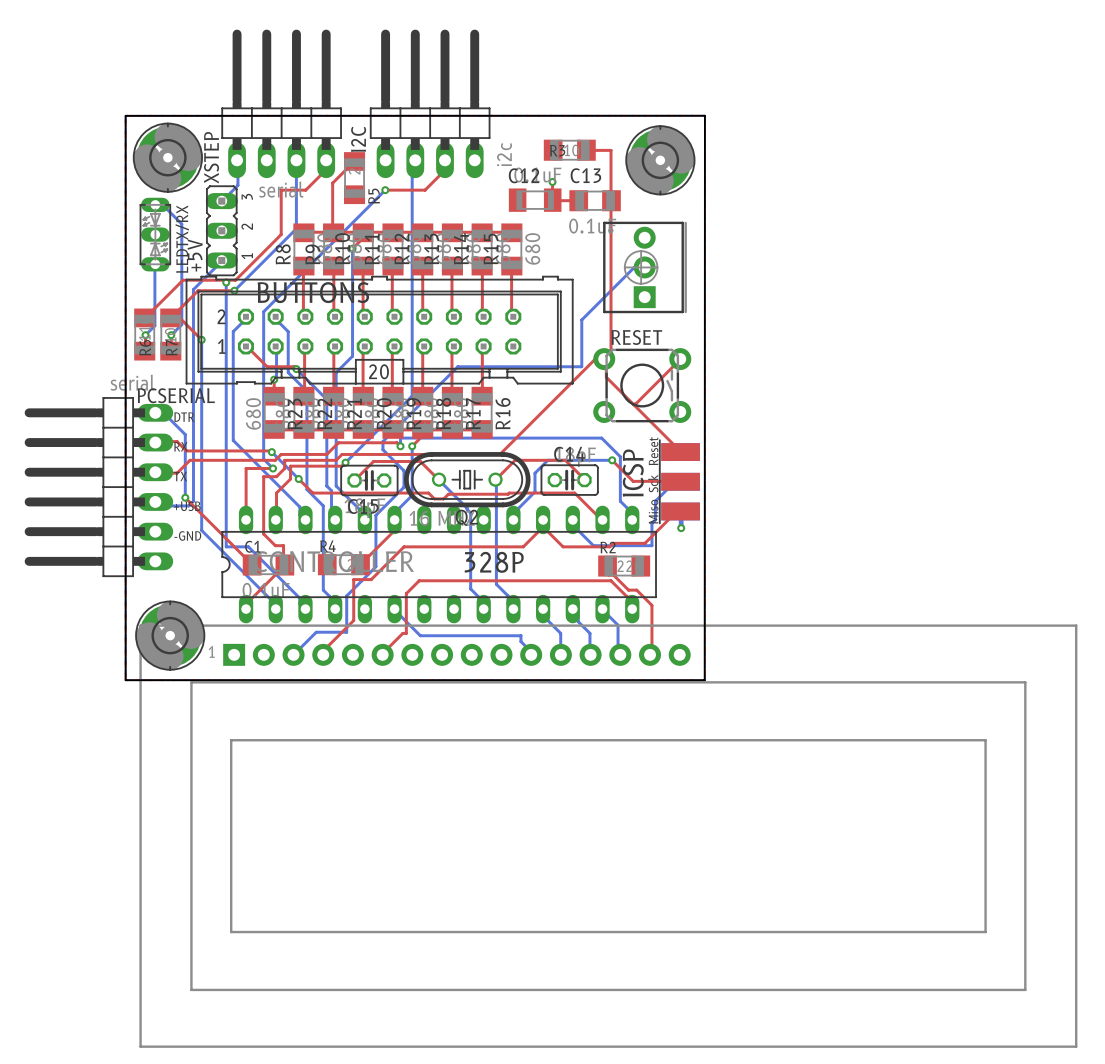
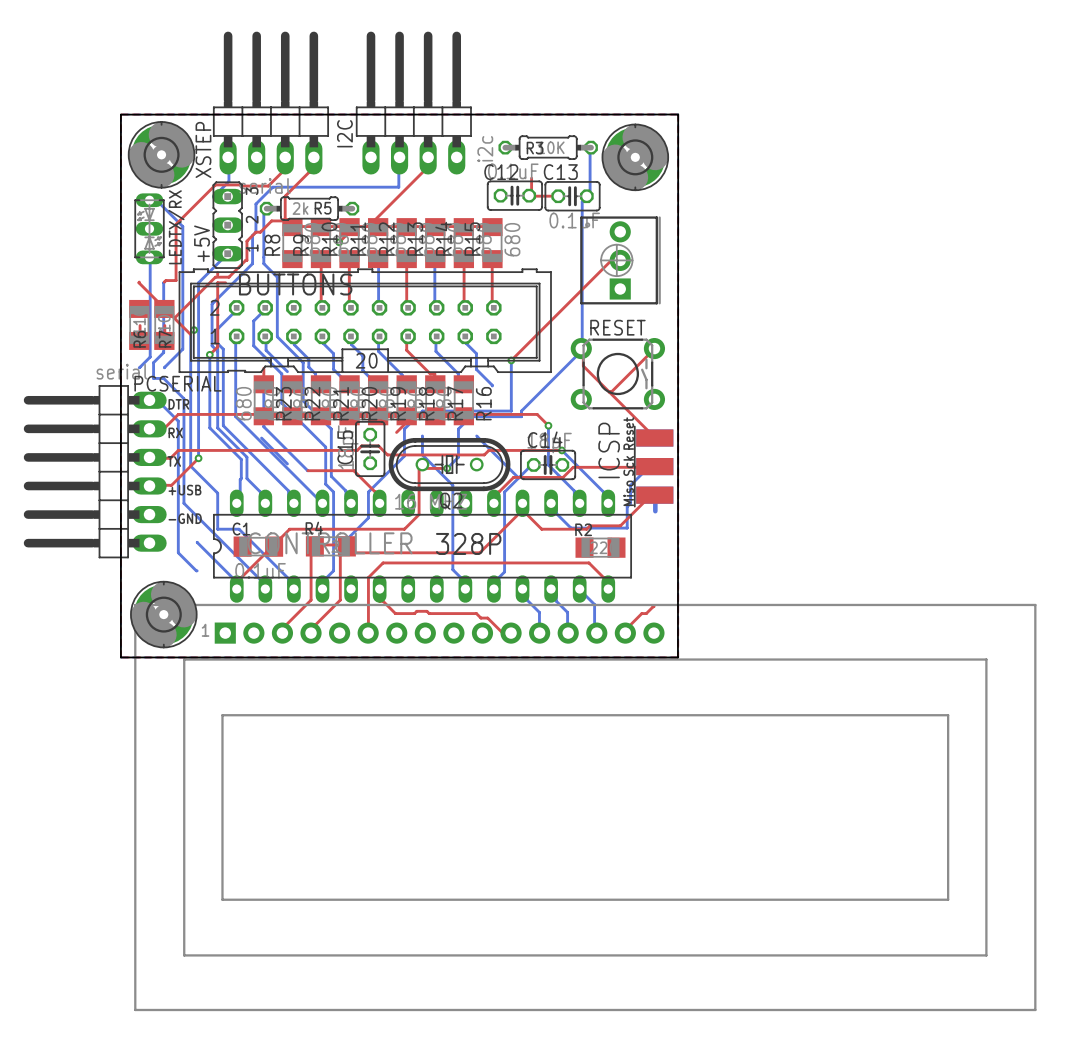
R3 footprint: [543, 139, 596, 161] -> [498, 135, 598, 160]
top track: (586, 150) (611, 150) (611, 358) (595, 358) (499, 454) (342, 454) (336, 460) (284, 460) (284, 468) (276, 476) (263, 476) (263, 533) (275, 545) (283, 545) (284, 564) (246, 604) -> none
bottom track: none -> (591, 147) (590, 193) (582, 201) (581, 351) (521, 411) (521, 416) (470, 416) (458, 429) (458, 457) (447, 468)
R5 footprint: [343, 152, 366, 205] -> [259, 196, 360, 221]
bottom track: (296, 160) (296, 228) (234, 290) -> none
top track: none -> (285, 157) (285, 172) (281, 172) (268, 186) (215, 184) (176, 224) (176, 280) (164, 282)
top track: (354, 161) (332, 183) (333, 232) -> none
top track: (325, 170) (305, 190) (281, 190) (281, 234) (235, 280) (182, 280) (144, 317) -> (313, 166) (313, 172) (308, 172) (285, 196) (285, 220) (271, 220) (260, 232) (255, 232) (246, 241) (246, 260) (228, 277) (215, 277) (174, 318)
bottom track: (414, 174) (412, 177) (412, 395) (345, 462) -> (398, 171) (398, 187) (272, 187) (255, 204) (255, 232) (252, 235) (252, 263) (212, 304) (212, 345) (217, 351)
via: (552, 181) -> none
C12 footprint: [508, 188, 562, 212] -> [486, 180, 543, 211]
bottom track: (385, 190) (263, 311) (263, 330) -> none
top track: (385, 190) (425, 190) -> (368, 226) (408, 186)
via: (385, 190) -> none
C13 footprint: [569, 190, 621, 212] -> [544, 181, 601, 212]
bottom track: none -> (266, 208) (263, 211) (263, 263) (277, 277) (277, 322)
bottom track: (181, 224) (181, 324) (171, 335) -> (174, 218) (182, 226) (182, 349) (164, 367)
+5V position: (221, 230) -> (227, 225)
bottom track: (352, 248) (352, 356) (336, 372) (336, 486) (359, 509) -> (277, 336) (303, 362) (303, 400) (331, 429) (331, 476) (345, 493)
bottom track: (221, 260) (193, 289) (193, 501) (188, 505) (156, 505) (155, 501) -> none
bottom track: none -> (227, 253) (198, 282) (198, 458)
bottom track: (155, 264) (154, 325) (145, 335) -> (149, 257) (150, 357) (139, 367)
bottom track: none -> (378, 257) (379, 307)
bottom track: none -> (435, 257) (434, 306) (436, 307)
top track: (303, 266) (303, 316) (305, 316) -> none
top track: (393, 266) (392, 316) (394, 316) -> none
top track: (452, 266) (451, 316) (453, 316) -> none
bottom track: (644, 267) (634, 267) (581, 319) (581, 366) (457, 366) (382, 441) (382, 449) (404, 470) (404, 487) -> (511, 360) (511, 411) (422, 411) (404, 429) (404, 456) (388, 471)
top track: none -> (620, 260) (610, 261) (511, 360)
bottom track: (226, 282) (226, 338) -> (224, 322) (217, 328)
via: (226, 282) -> none
top track: none -> (139, 282) (190, 334)
top track: (226, 290) (198, 290) (170, 317) (175, 314) (201, 339) -> (217, 282) (217, 346) (209, 354)
via: (234, 290) -> none
bottom track: (275, 316) (288, 331) -> (265, 307) (253, 321)
bottom track: (233, 331) (233, 440) -> (217, 343) (223, 349) (224, 426)
via: (145, 335) -> none
via: (171, 335) -> none
bottom track: (201, 339) (201, 530) -> (164, 282) (163, 352) (153, 362) (153, 378) (163, 378) (183, 398) (183, 503) (194, 513)
bottom track: none -> (190, 334) (190, 466) (217, 493)
top track: (245, 346) (267, 366) (294, 366) (296, 369) -> none
bottom track: (288, 346) (288, 372) -> none
bottom track: none -> (293, 336) (294, 344) (308, 359) (308, 367) (315, 373) (315, 380) (320, 385)
top track: (305, 346) (303, 396) -> none
bottom track: none -> (322, 336) (323, 343) (333, 353) (333, 369) (349, 385)
top track: (335, 346) (333, 396) -> none
bottom track: none -> (350, 336) (351, 344) (362, 355) (362, 370) (378, 385)
top track: (364, 346) (363, 346) (363, 396) -> none
bottom track: none -> (379, 336) (378, 351) (402, 375) (402, 380) (406, 385)
top track: (394, 346) (392, 346) (393, 396) -> none
bottom track: none -> (436, 336) (435, 351) (458, 373) (458, 380) (463, 385)
top track: (453, 346) (451, 346) (451, 385) -> none
bottom track: none -> (465, 336) (466, 343) (476, 353) (476, 369) (492, 385)
top track: (483, 346) (482, 396) -> none
bottom track: (263, 356) (263, 459) (273, 468) -> none
bottom track: (276, 360) (276, 377) (274, 379) -> (266, 350) (277, 361)
top track: (422, 360) (422, 396) -> (406, 350) (430, 373) (434, 373)
bottom track: none -> (209, 354) (209, 427) (241, 459) (240, 499) (236, 503)
via: none -> (209, 354)
bottom track: (296, 369) (326, 399) (326, 486) (331, 490) (331, 516) -> (236, 336) (235, 416) (318, 499)
via: (296, 369) -> none
via: none -> (511, 360)
via: (274, 379) -> none
bottom track: (298, 383) (306, 391) (306, 489) (323, 505) (323, 590) (330, 597) (330, 604) (335, 609) -> (253, 345) (281, 373) (281, 403) (325, 447) (325, 484) (333, 492) (333, 570) (326, 577) (326, 585) (322, 589)
bottom track: none -> (263, 385) (263, 426) (307, 470)
bottom track: none -> (548, 425) (548, 465) (574, 490) (574, 498) (579, 503)
via: none -> (548, 425)
top track: (171, 441) (177, 441) (186, 450) (271, 452) -> (164, 427) (178, 414) (537, 414) (548, 425)
bottom track: (226, 441) (226, 509) -> (217, 427) (246, 457) (246, 478) (260, 492) (260, 498) (265, 503)
bottom track: (400, 446) (400, 438) (601, 438) (620, 456) (620, 501) -> (561, 450) (596, 485)
top track: (400, 446) (396, 442) (338, 442) (326, 454) (281, 454) (275, 460) (189, 460) (185, 464) -> (561, 450) (488, 450) (484, 454) (387, 454) (378, 445) (361, 445) (357, 450) (178, 450)
via: (400, 446) -> none
bottom track: (412, 446) (412, 495) (399, 508) (399, 515) (394, 519) -> none
via: (412, 446) -> none
bottom track: none -> (476, 435) (518, 478)
via: (271, 452) -> none
bottom track: (612, 460) (547, 460) (534, 473) (534, 491) (518, 508) (518, 515) (513, 519) -> none
top track: (612, 460) (633, 481) (680, 481) -> (552, 477) (563, 477) (573, 467) (654, 466)
via: (612, 460) -> none
top track: (345, 462) (342, 466) (290, 466) (290, 479) (276, 493) (275, 519) -> none
via: (345, 462) -> none
via: none -> (561, 450)
top track: (273, 468) (246, 468) (246, 519) -> none
via: (273, 468) -> none
top track: none -> (198, 458) (171, 485) (149, 485)
top track: (298, 479) (312, 493) (428, 493) (434, 498) (443, 498) (448, 494) (533, 493) -> (493, 503) (494, 492) (498, 492) (513, 477)
via: (298, 479) -> none
bottom track: (439, 479) (470, 512) -> (422, 435) (422, 454) (452, 485) (452, 496)
top track: (439, 479) (420, 461) (373, 461) (354, 480) -> none
bottom track: (495, 479) (496, 584) (508, 595) (508, 604) (513, 609) -> (530, 461) (529, 467) (504, 492) (504, 571) (498, 577) (498, 584) (493, 589)
top track: (495, 479) (515, 460) (565, 460) (584, 480) -> none
C15 rotation: 0° (369, 480) -> 90° clockwise (370, 448)
top track: none -> (447, 468) (419, 468) (419, 514) (404, 529)
via: none -> (447, 468)
top track: (574, 493) (602, 519) -> none
bottom track: none -> (178, 481) (178, 552) (197, 570)
top track: (185, 497) (252, 564) -> none
via position: (185, 497) -> (198, 458)
bottom track: (382, 508) (375, 515) (375, 566) (346, 595) (346, 632) (316, 632) (293, 654) -> (368, 492) (368, 517) (341, 544)
top track: (393, 519) (393, 531) (360, 564) -> (378, 503) (378, 492) (375, 492) (353, 470) (307, 470)
via: (681, 528) -> none
top track: (404, 546) (371, 579) (353, 579) -> (388, 529) (289, 529) (241, 577) (236, 577) (236, 584)
top track: (420, 546) (523, 546) -> (340, 560) (340, 552) (479, 552) (503, 529)
bottom track: none -> (197, 542) (235, 580) (236, 589)
top track: none -> (341, 544) (311, 544) (311, 600) (286, 624) (282, 624) (282, 633)
top track: (607, 566) (608, 574) (613, 574) (628, 590) (636, 590) (651, 605) (650, 654) -> (654, 606) (646, 613) (641, 613) (626, 629) (626, 632)
top track: (612, 581) (419, 580) (406, 593) (406, 633) (402, 633) (382, 654) -> (588, 562) (383, 562) (368, 577) (368, 633)
bottom track: (394, 609) (420, 635) (520, 635) (520, 641) (530, 650) (531, 654) -> none
top track: none -> (379, 589) (379, 601) (383, 601) (395, 613) (414, 613) (416, 611) (426, 611) (429, 613) (476, 613) (480, 618) (487, 618) (502, 632) (511, 633)

